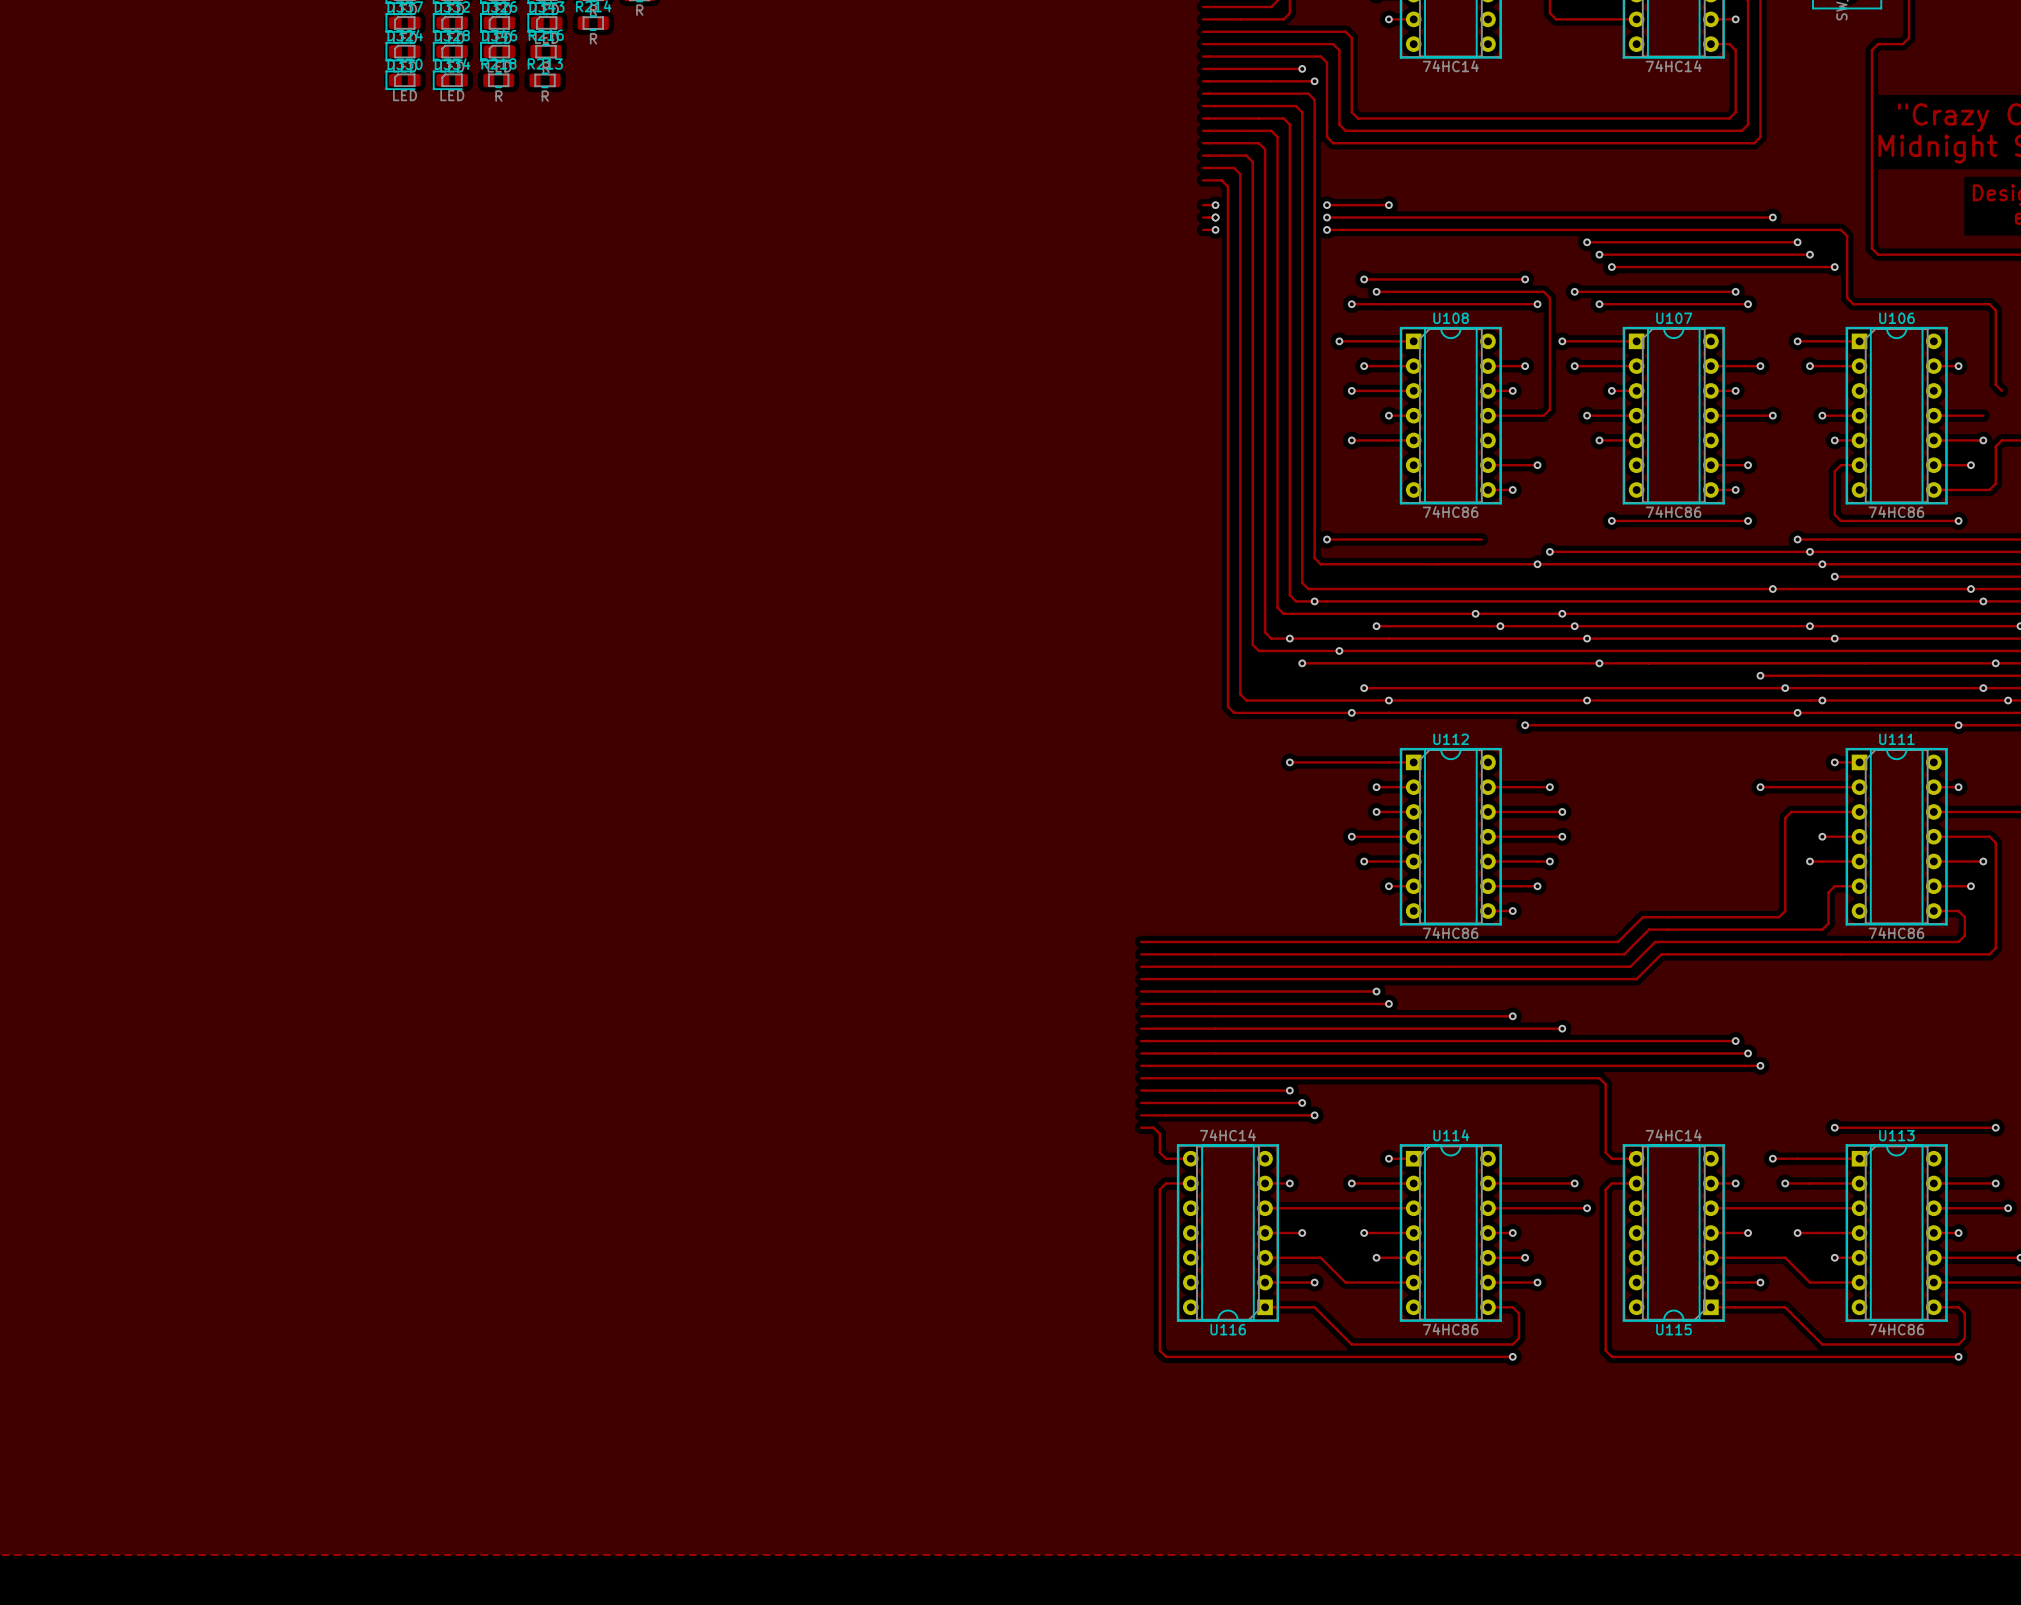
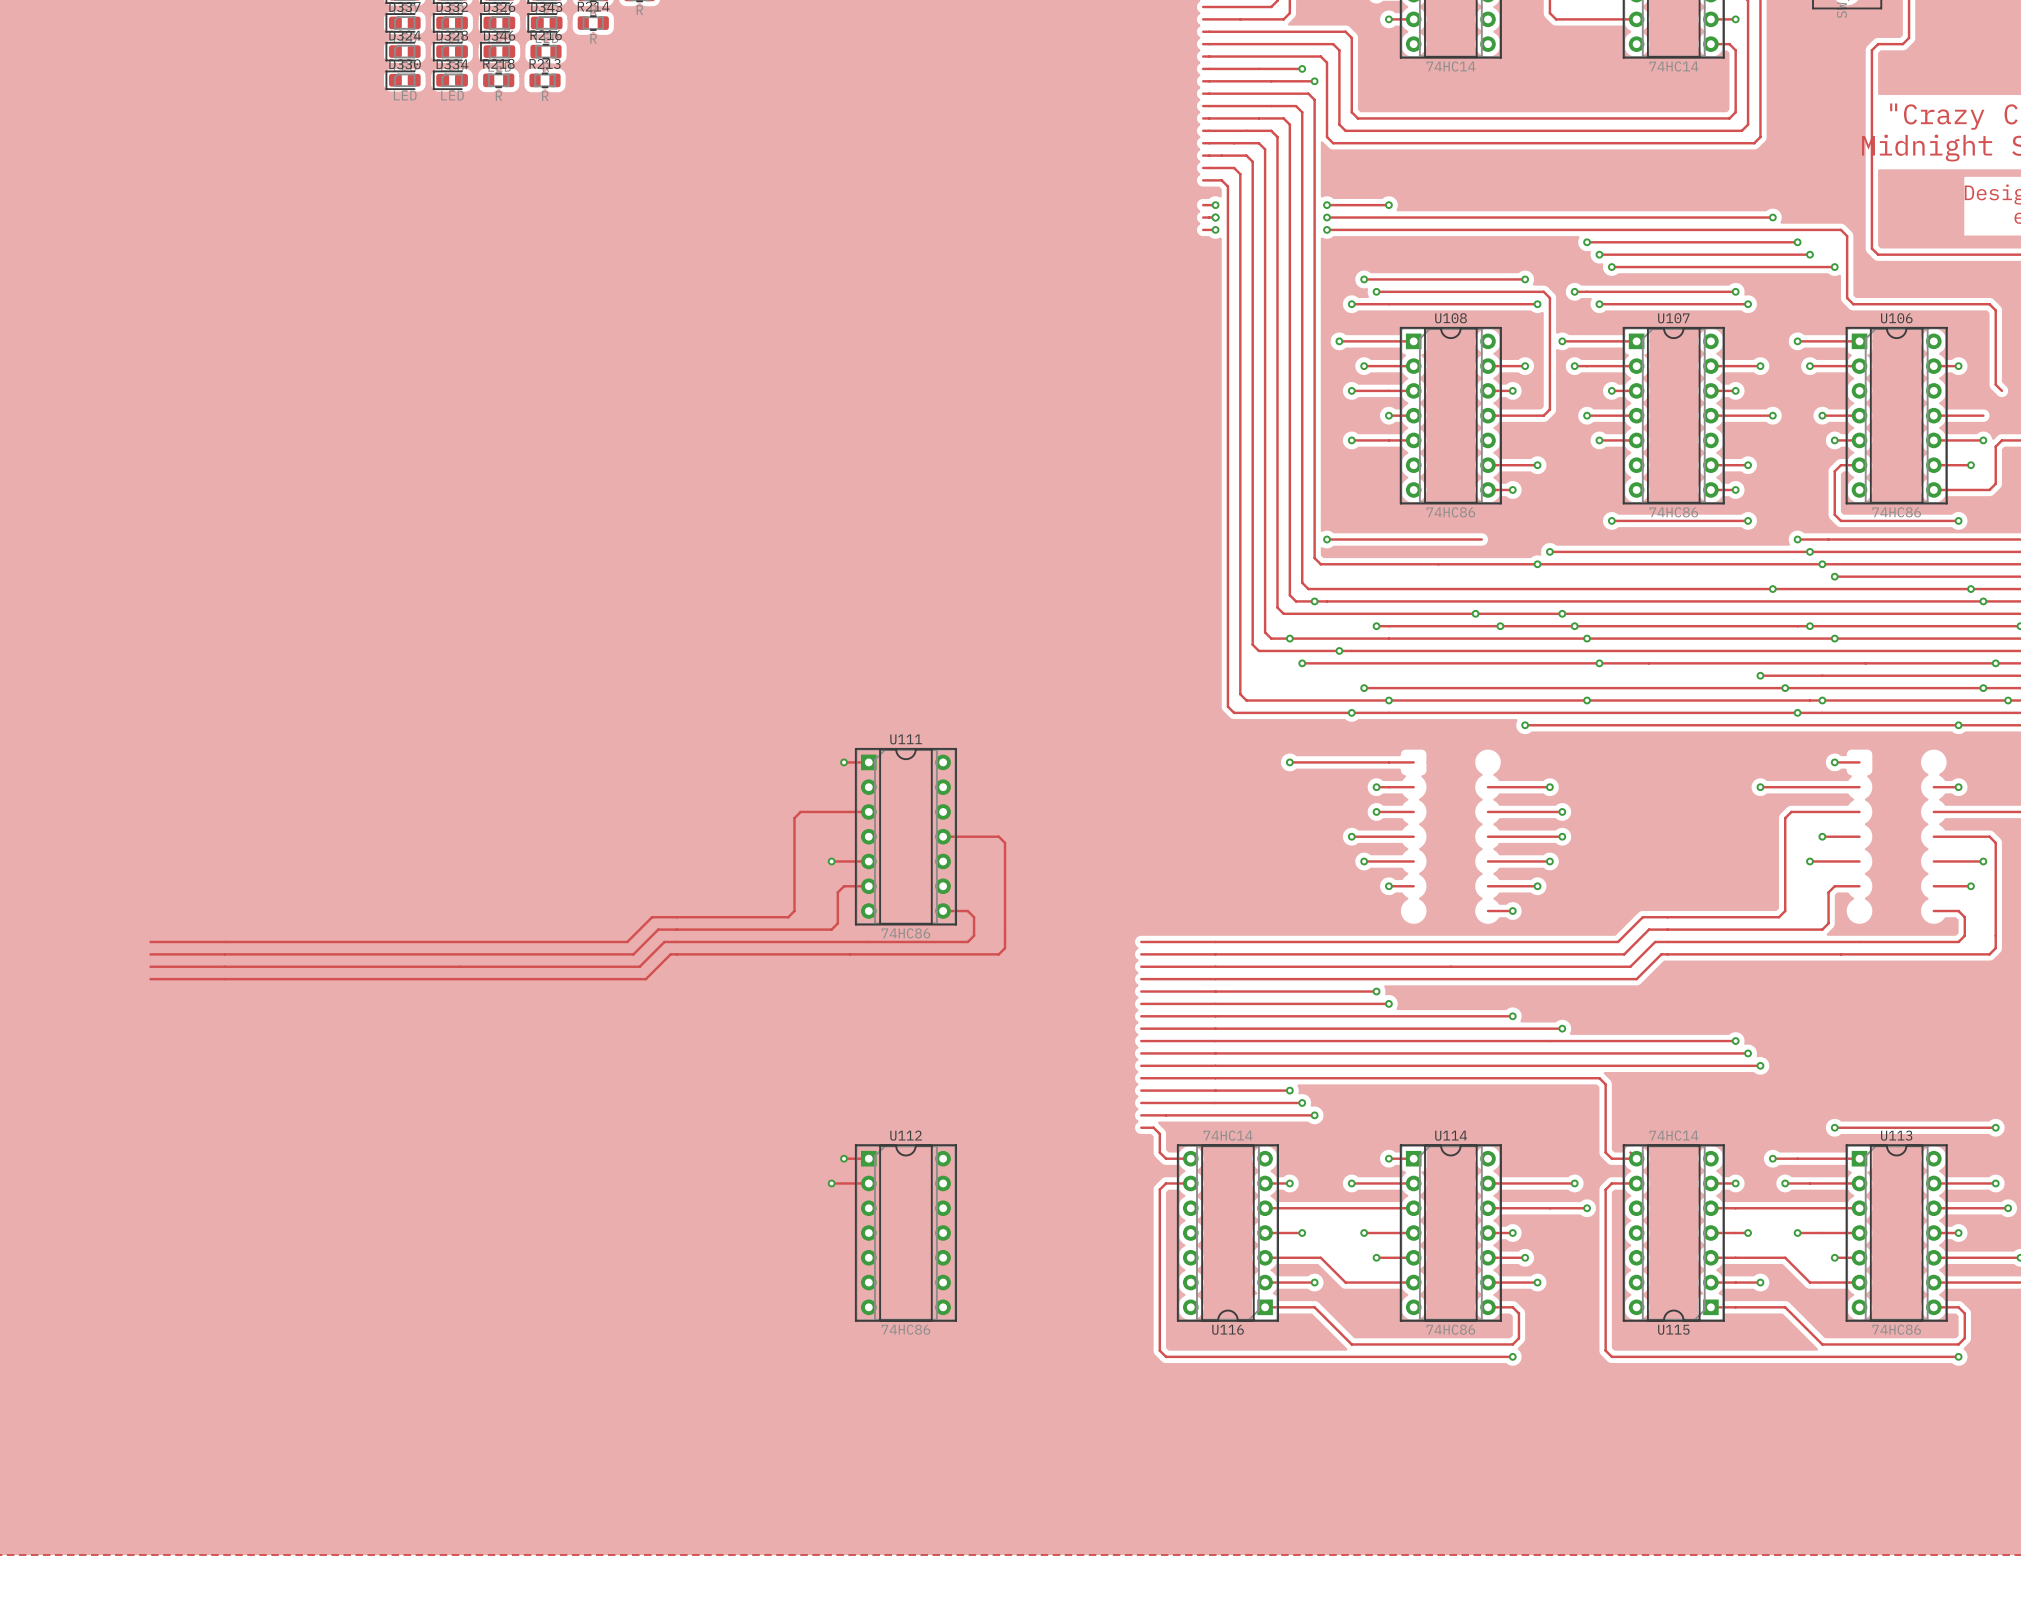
track: none -> (844, 762) (868, 762)
via: none -> (844, 762)
track: none -> (868, 811) (800, 811) (794, 818) (794, 911) (788, 917) (652, 917) (627, 941) (150, 941)
track: none -> (943, 836) (998, 836) (1005, 842) (1005, 948) (998, 954) (670, 954) (645, 979) (150, 979)
U112 position: (1450, 836) -> (905, 1233)
U111 position: (1896, 836) -> (905, 836)
track: none -> (831, 861) (868, 861)
via: none -> (831, 861)
track: none -> (868, 886) (844, 886) (837, 892) (837, 923) (831, 929) (658, 929) (633, 954) (150, 954)
track: none -> (943, 911) (967, 911) (974, 917) (974, 935) (967, 941) (664, 941) (639, 966) (150, 966)
track: none -> (844, 1158) (868, 1158)
via: none -> (844, 1158)
track: none -> (831, 1183) (868, 1183)
via: none -> (831, 1183)

